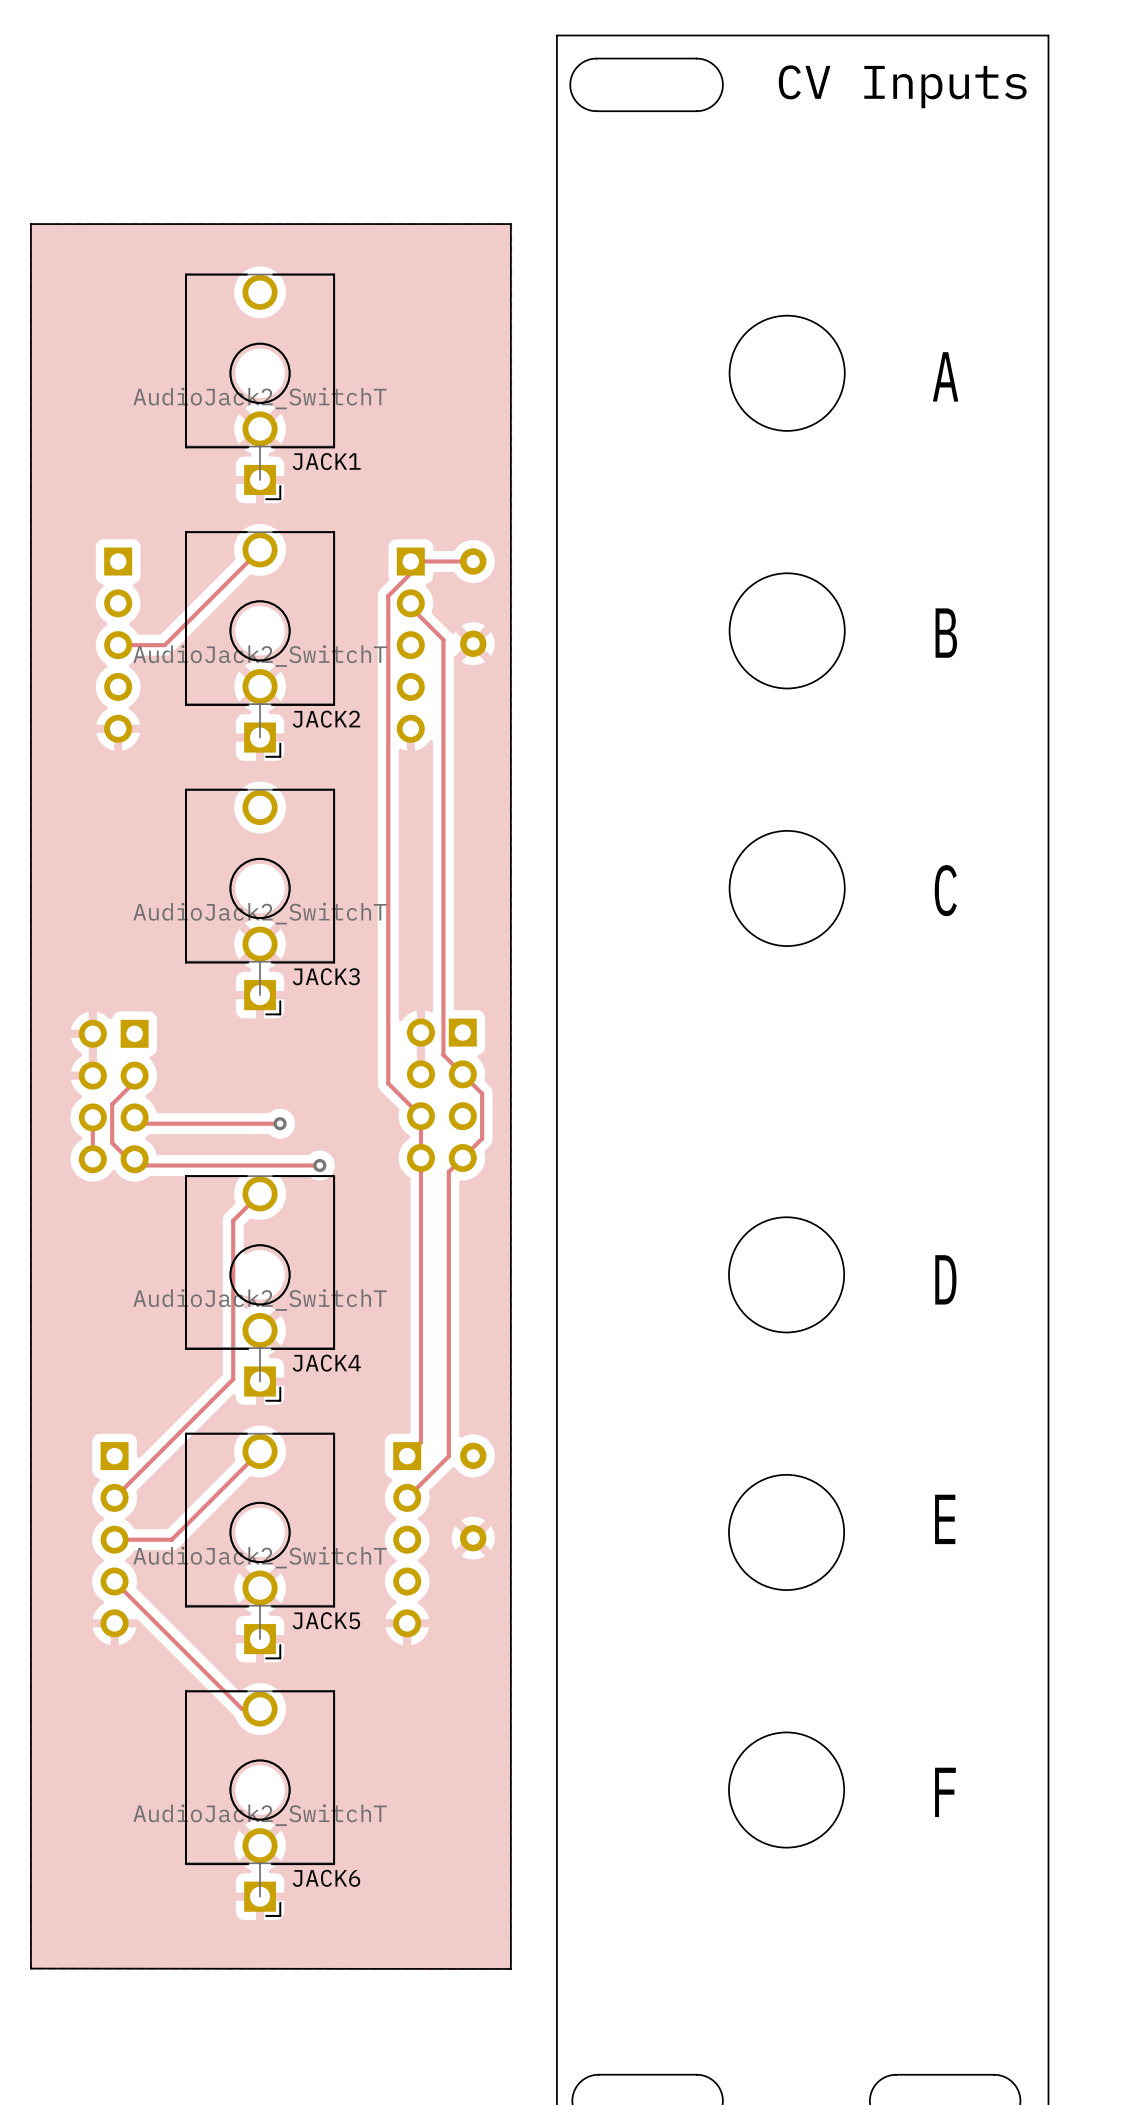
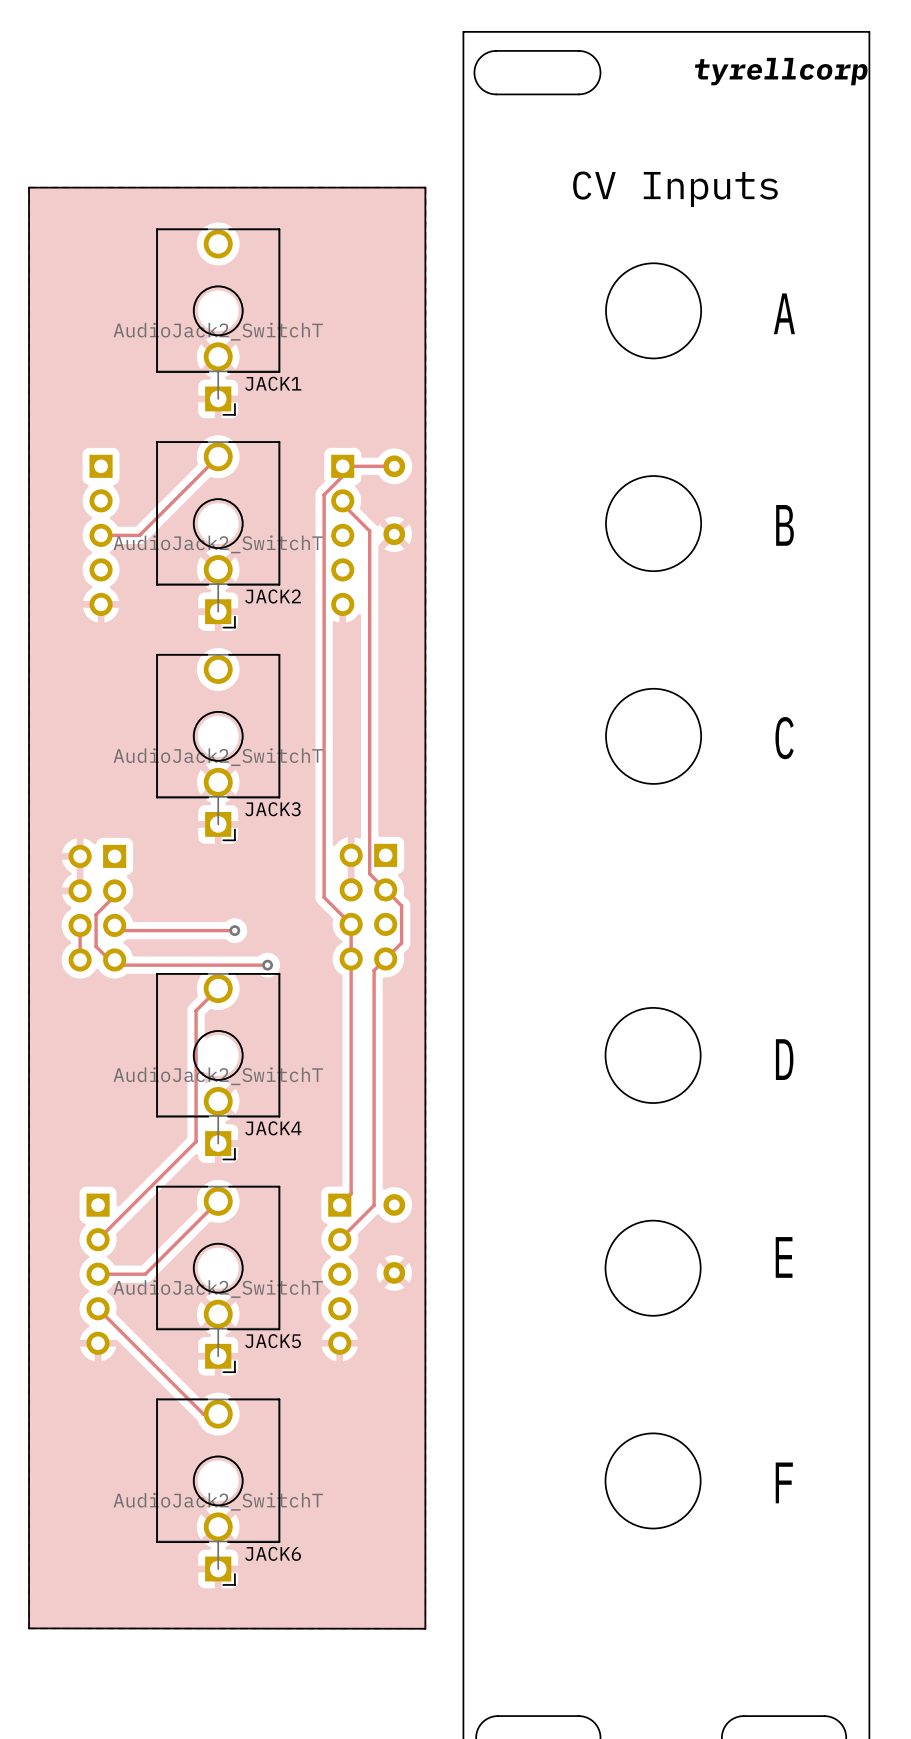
text: none -> tyrellcorp (781, 71)
text position: CV Inputs (902, 86) -> CV Inputs (675, 189)

